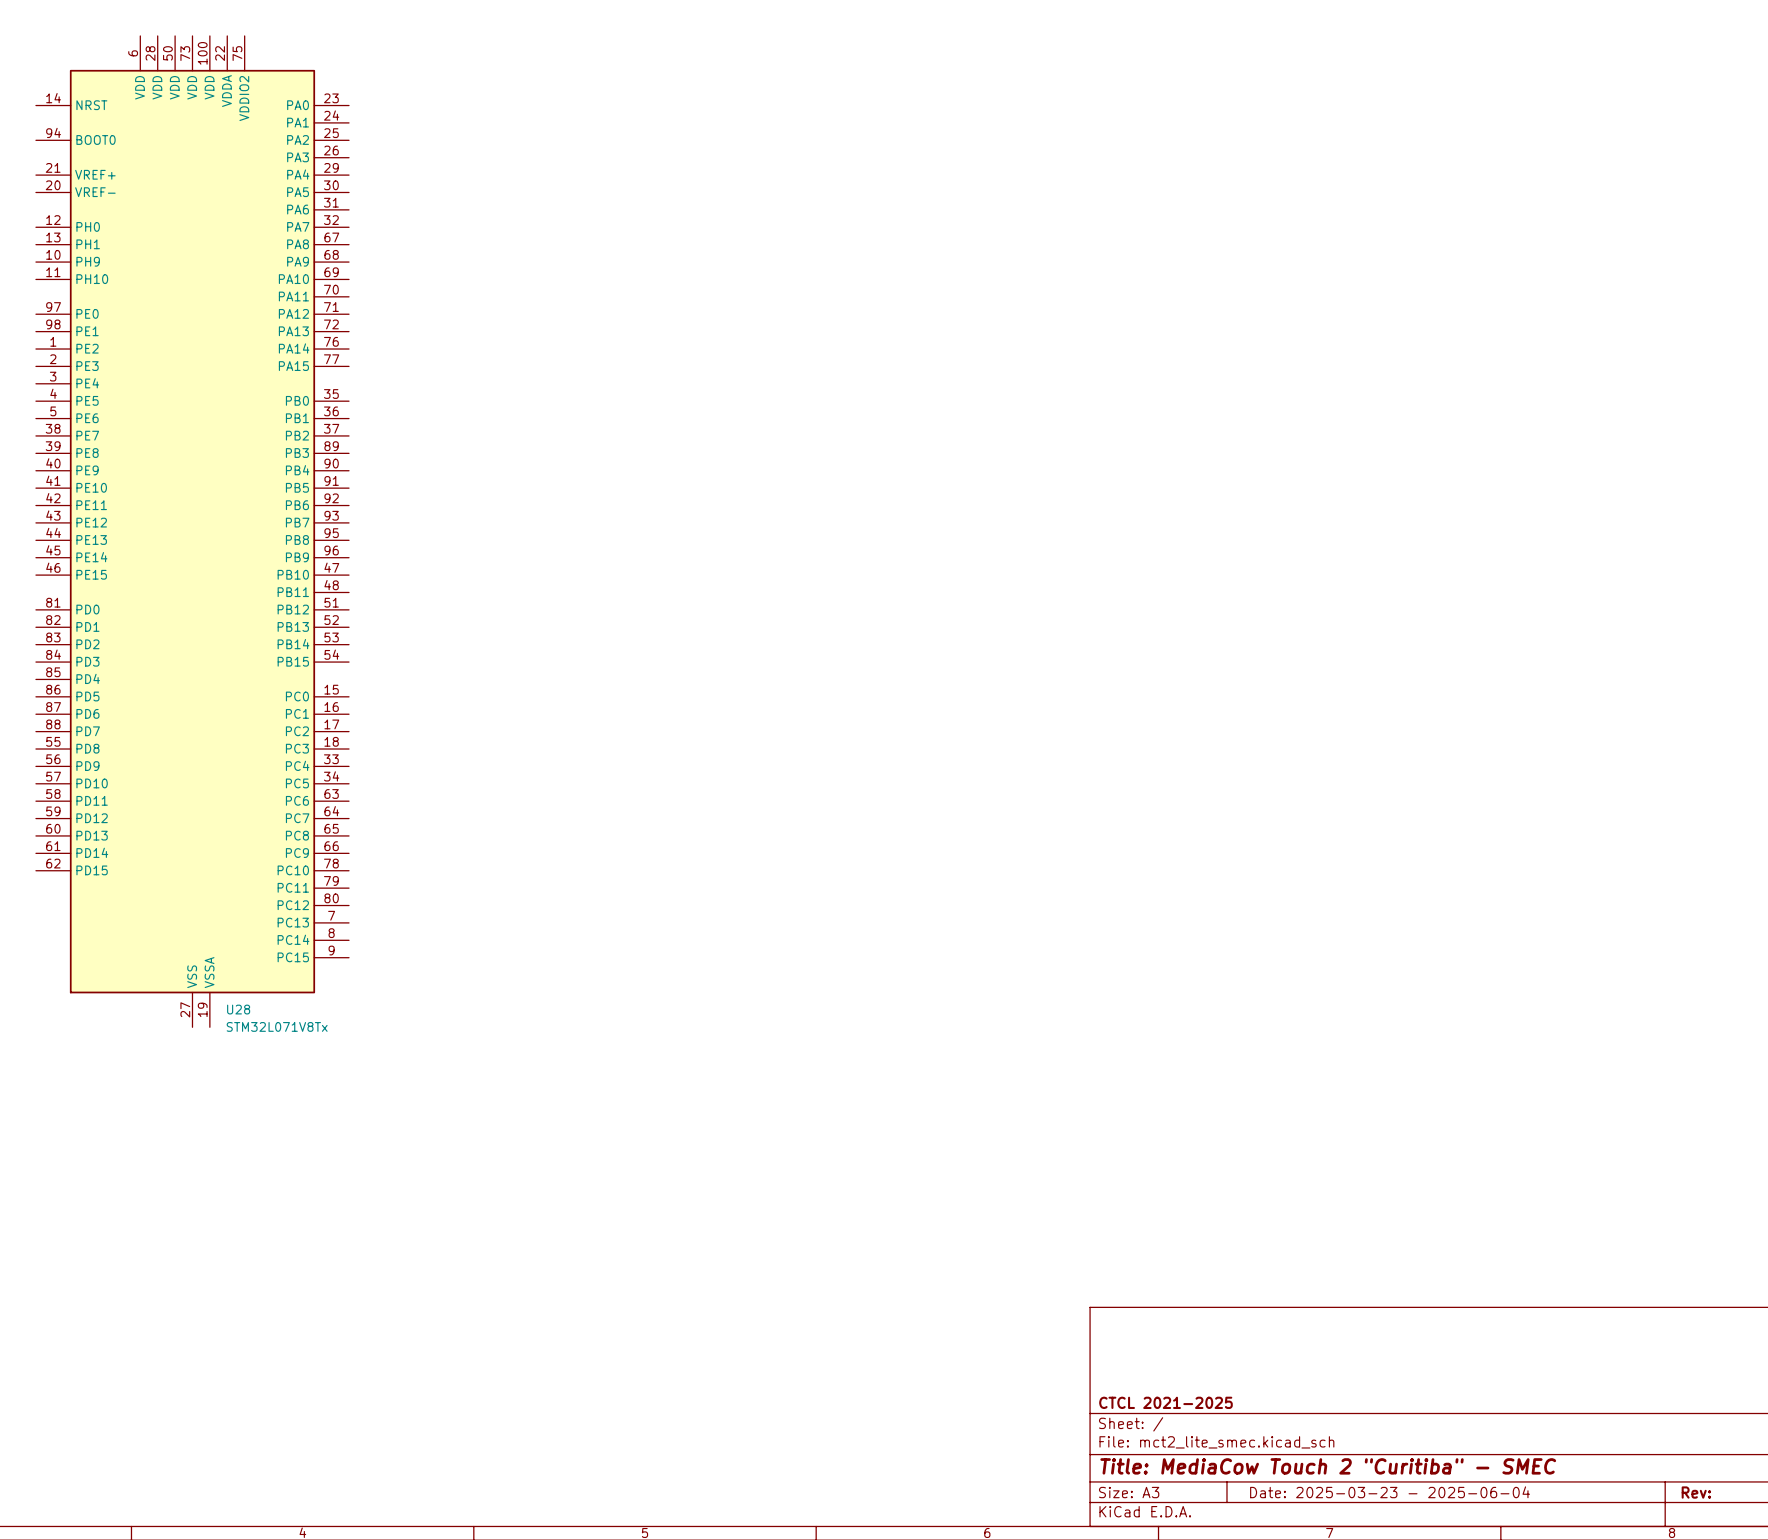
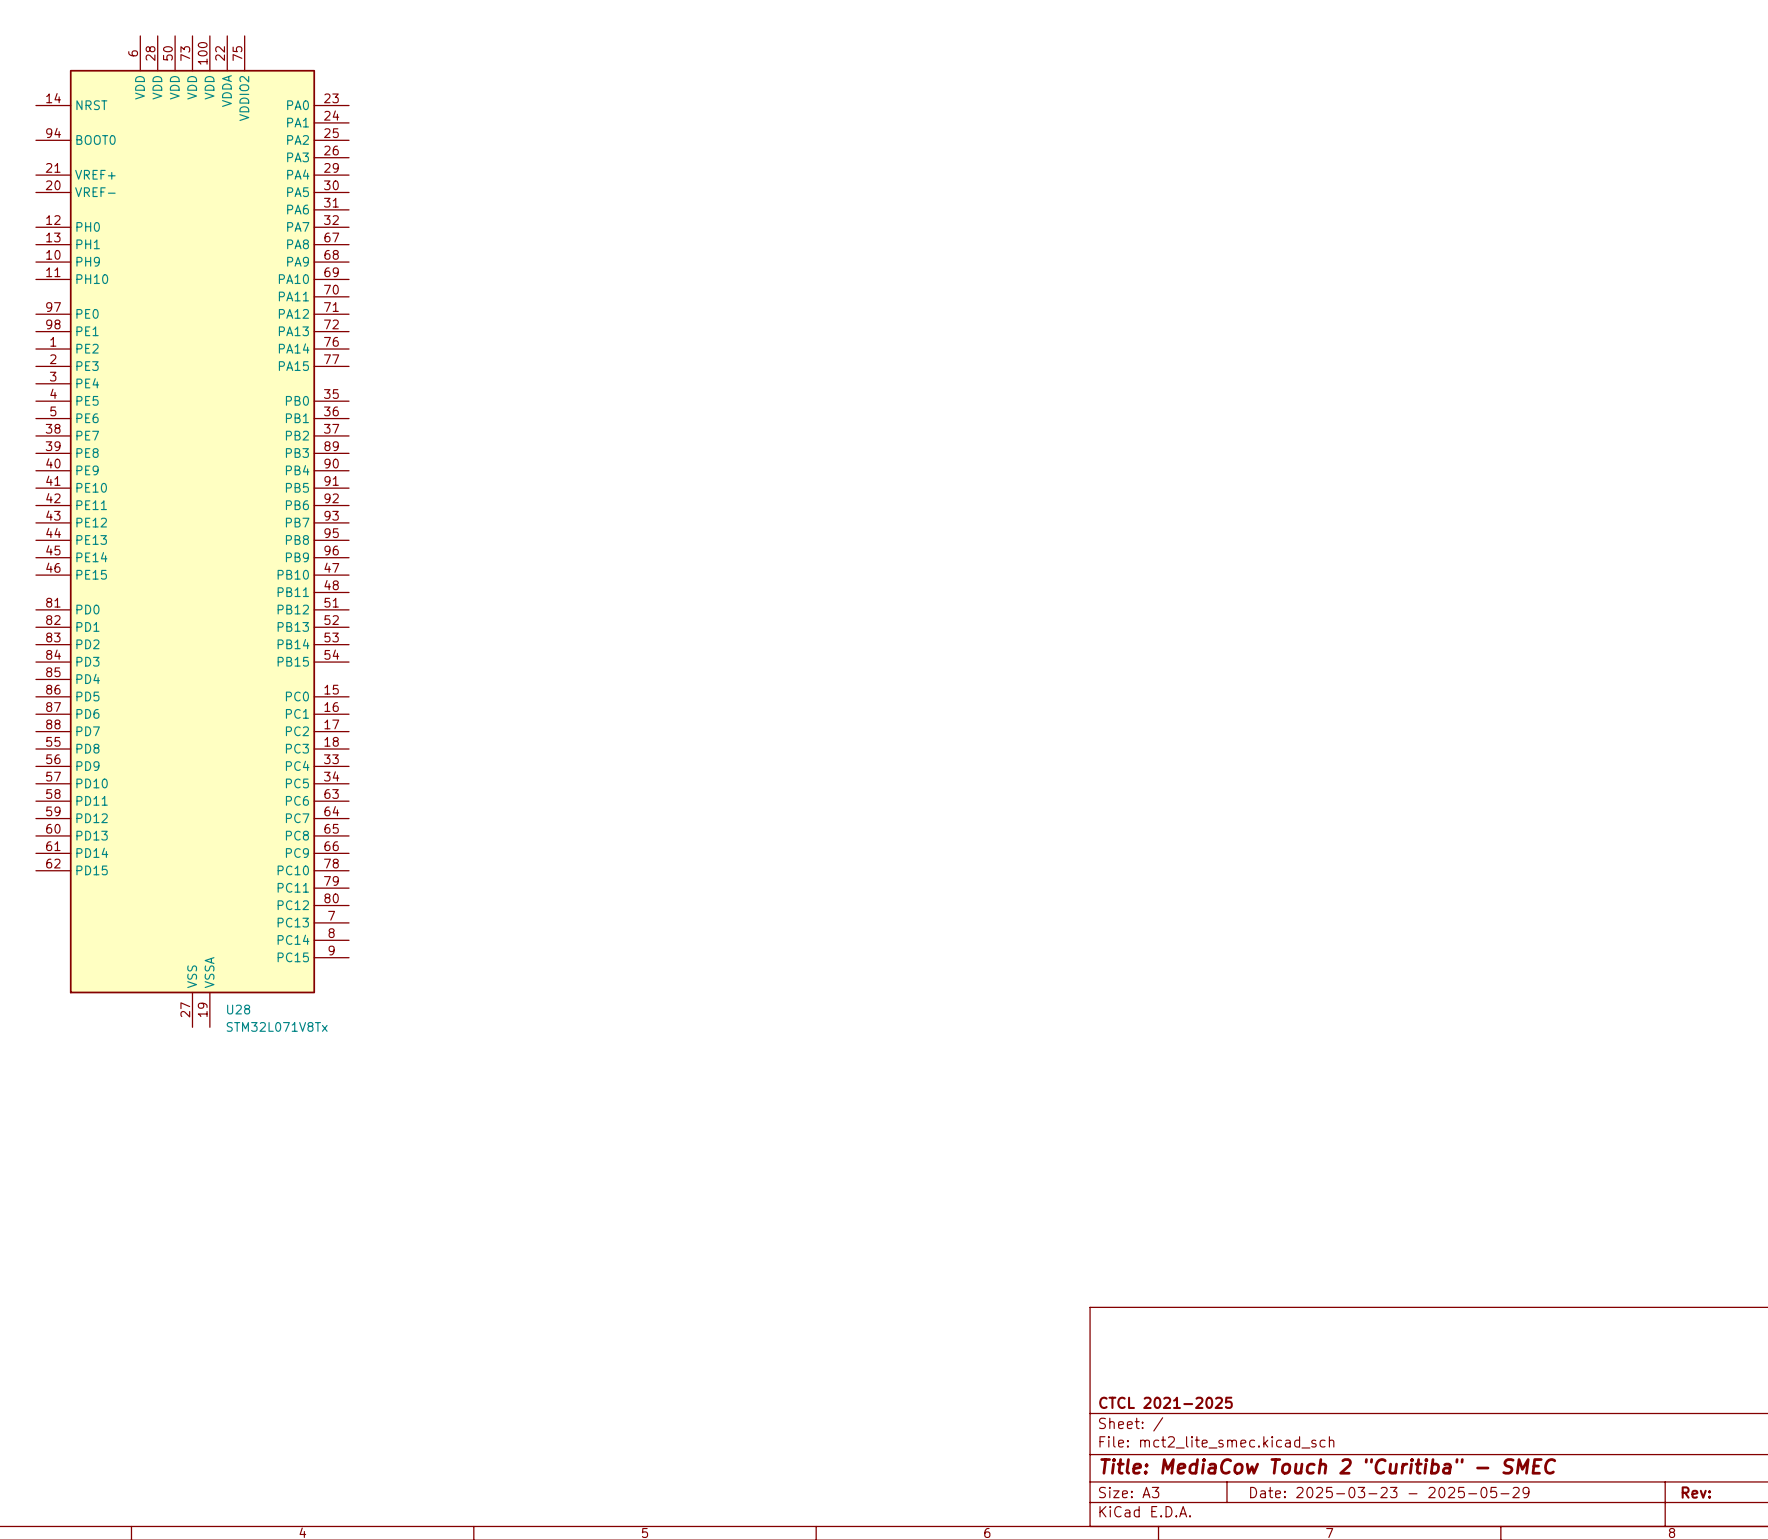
title block: Date: 2025-03-23 - 2025-06-04 (1390, 1492) -> Date: 2025-03-23 - 2025-05-29 (1389, 1492)

